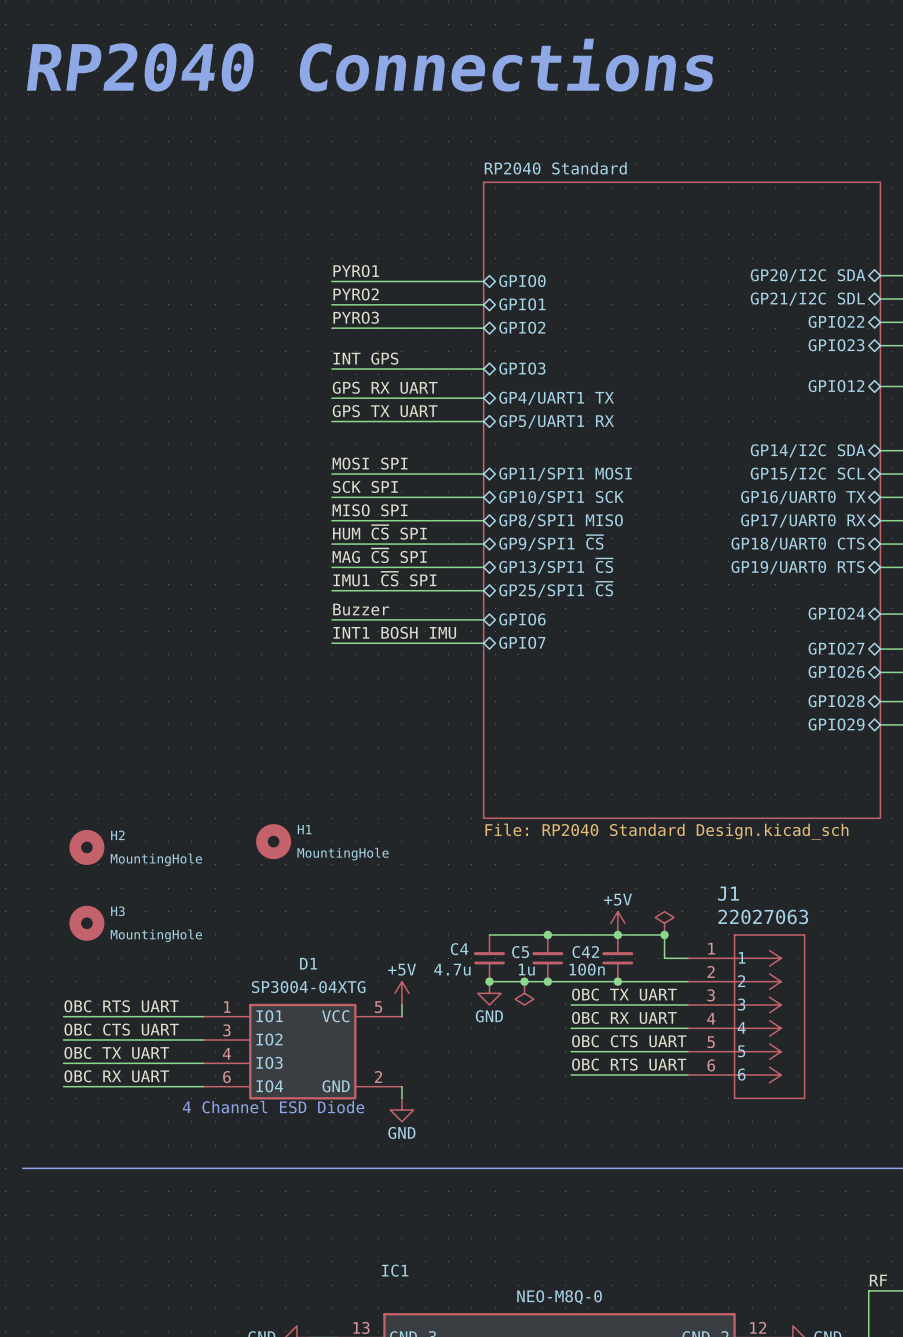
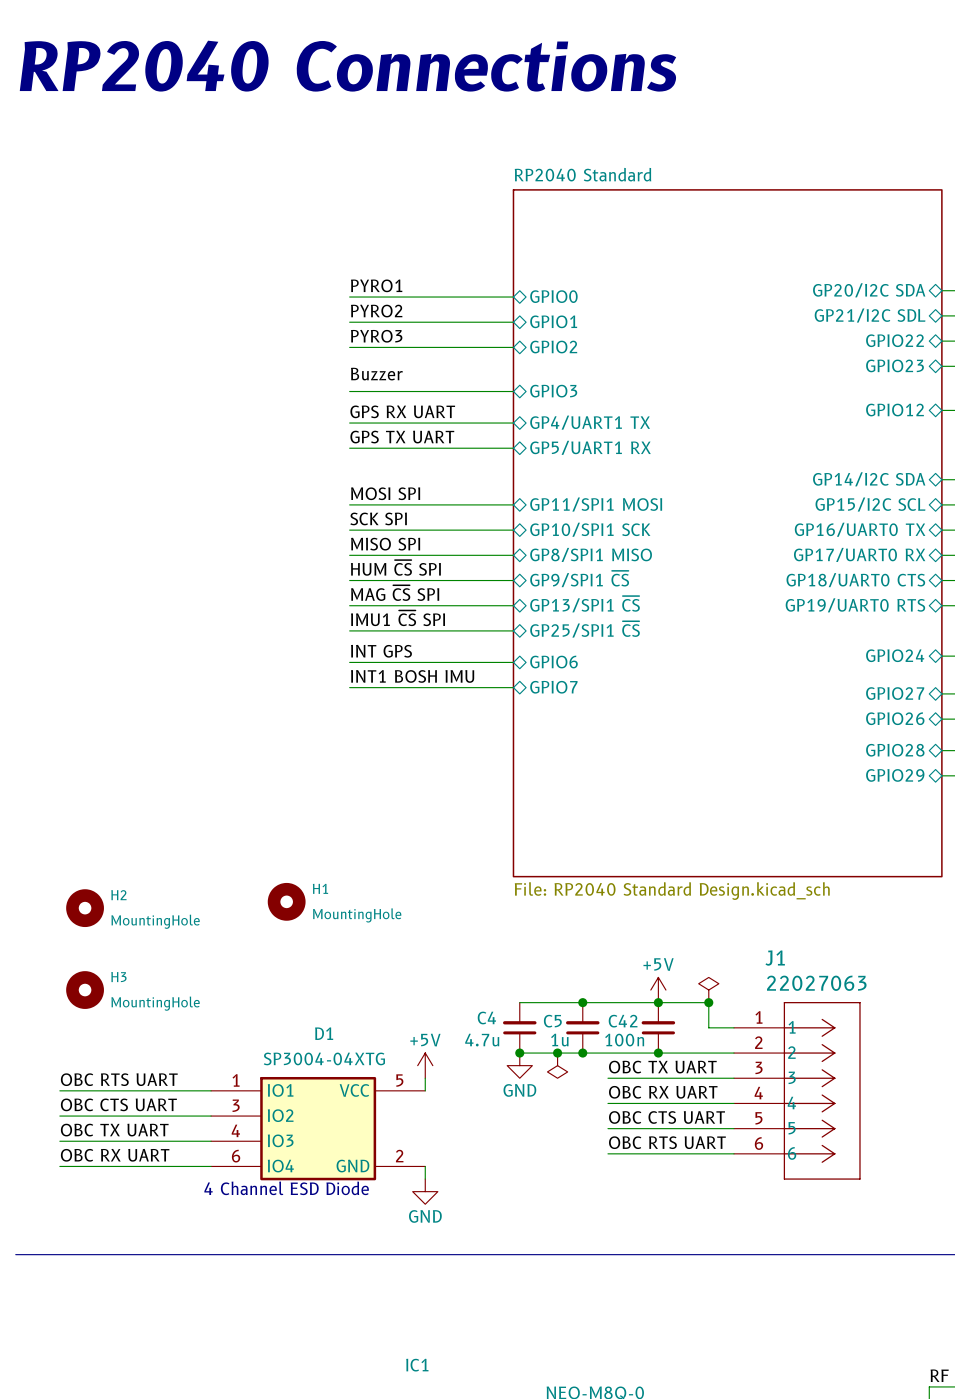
label: INT GPS (365, 358) -> Buzzer (376, 374)
label: Buzzer (361, 609) -> INT GPS (381, 651)

